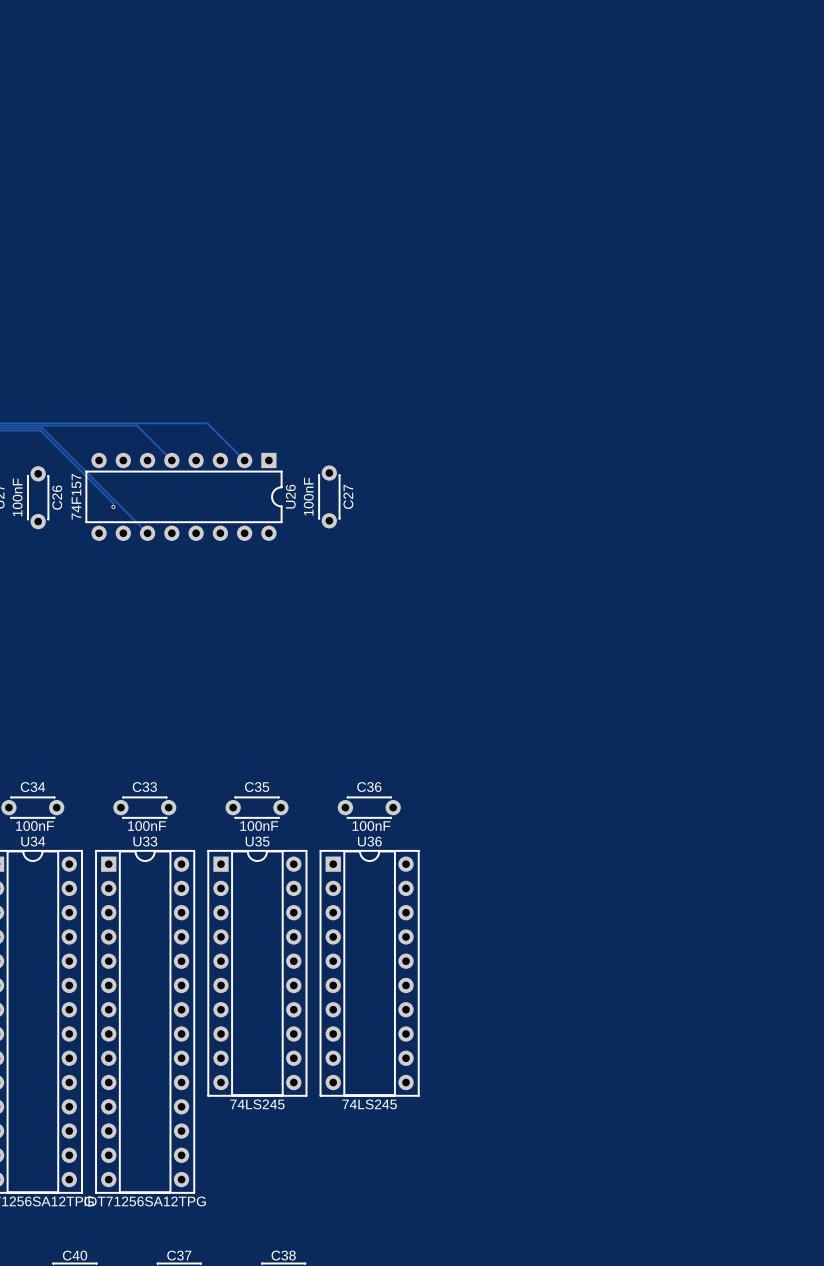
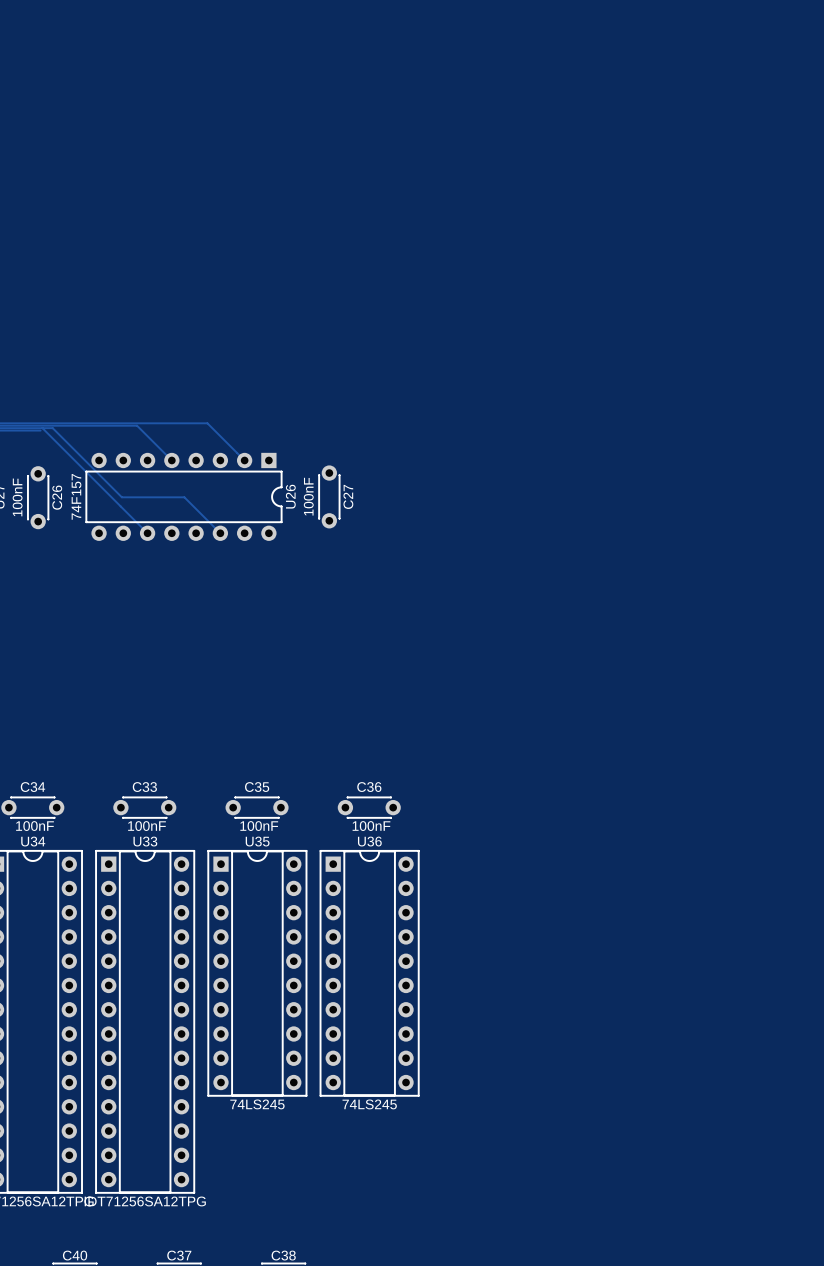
track: none -> (42, 428) (52, 428) (121, 497) (184, 497) (220, 533)
track: (40, 430) (113, 503) (113, 507) -> none
via: (113, 507) -> none

